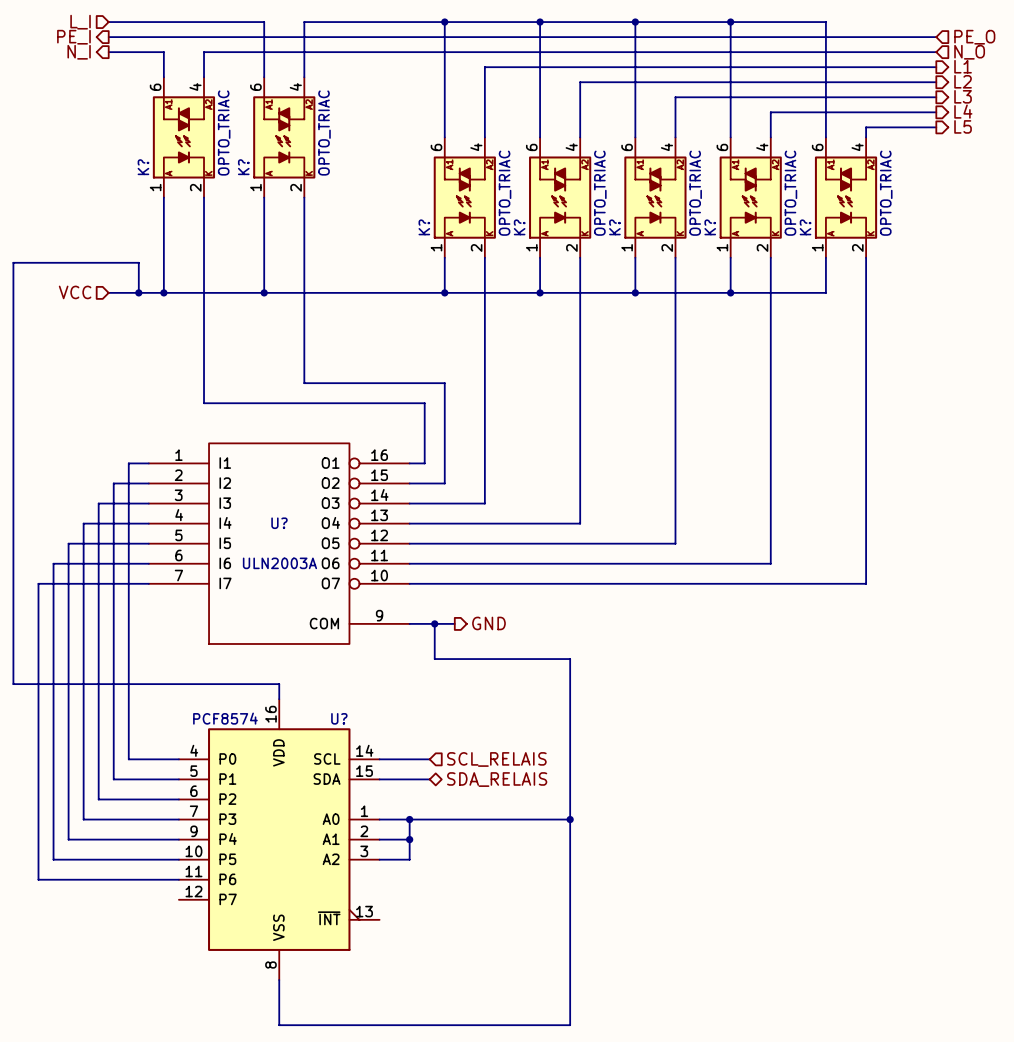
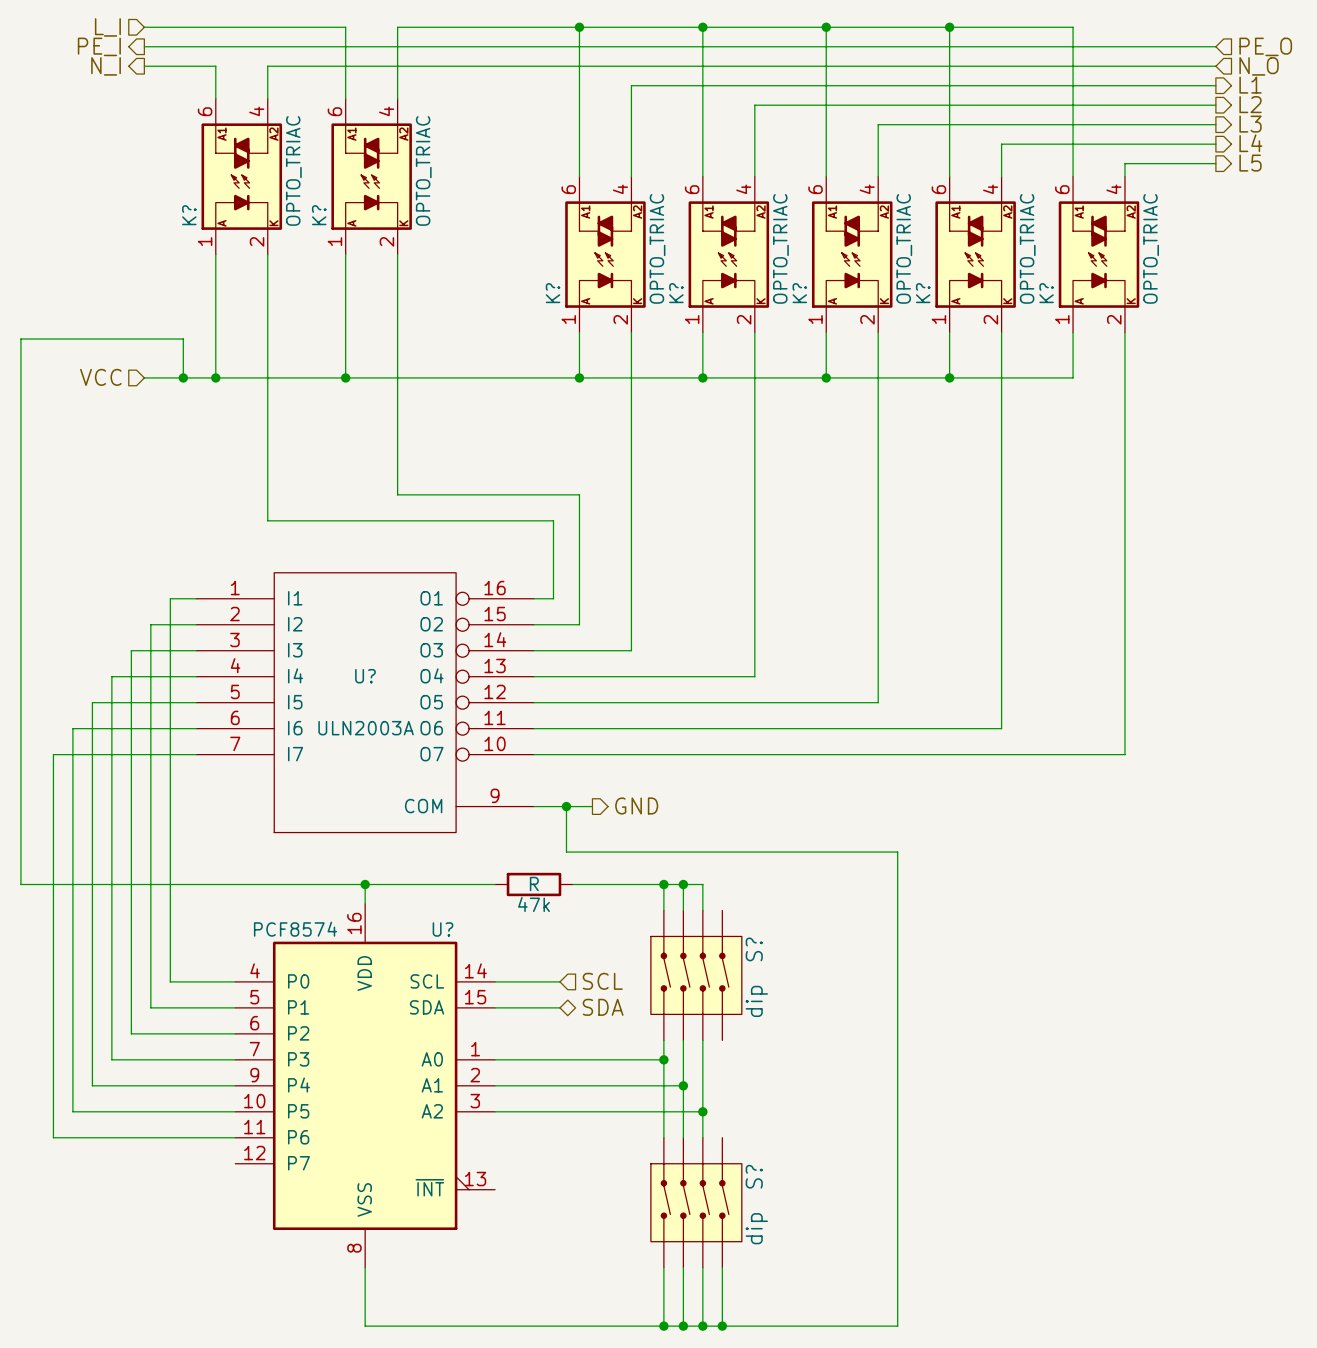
wire: (570, 659) (570, 1025) -> (741, 852) (897, 852) (897, 1326) (741, 1326)
wire: none -> (365, 884) (495, 884)
junction: none -> (365, 884)
47k: none -> R (534, 884)
wire: none -> (572, 884) (702, 884) (702, 910)
wire: none -> (663, 884) (663, 910)
junction: none -> (663, 884)
wire: none -> (683, 884) (683, 910)
junction: none -> (683, 884)
S?: none -> dip (696, 975)
hierarchical label: SCL_RELAIS (496, 759) -> SCL (602, 981)
hierarchical label: SDA_RELAIS (497, 779) -> SDA (603, 1007)
wire: none -> (663, 1040) (663, 1137)
wire: none -> (683, 1040) (683, 1137)
wire: none -> (702, 1040) (702, 1137)
wire: (409, 819) (409, 859) -> (702, 1111) (534, 1111)
junction: (409, 819) -> none
wire: (509, 819) (570, 819) -> none
junction: none -> (663, 1059)
junction: (570, 819) -> none
wire: none -> (534, 1085) (683, 1085)
junction: (409, 839) -> none
junction: none -> (683, 1085)
junction: none -> (702, 1111)
S?: none -> dip (696, 1202)
wire: none -> (663, 1267) (663, 1326)
wire: none -> (683, 1267) (683, 1326)
wire: none -> (702, 1267) (702, 1326)
wire: none -> (722, 1267) (722, 1326)
junction: none -> (663, 1326)
junction: none -> (683, 1326)
junction: none -> (702, 1326)
junction: none -> (722, 1326)

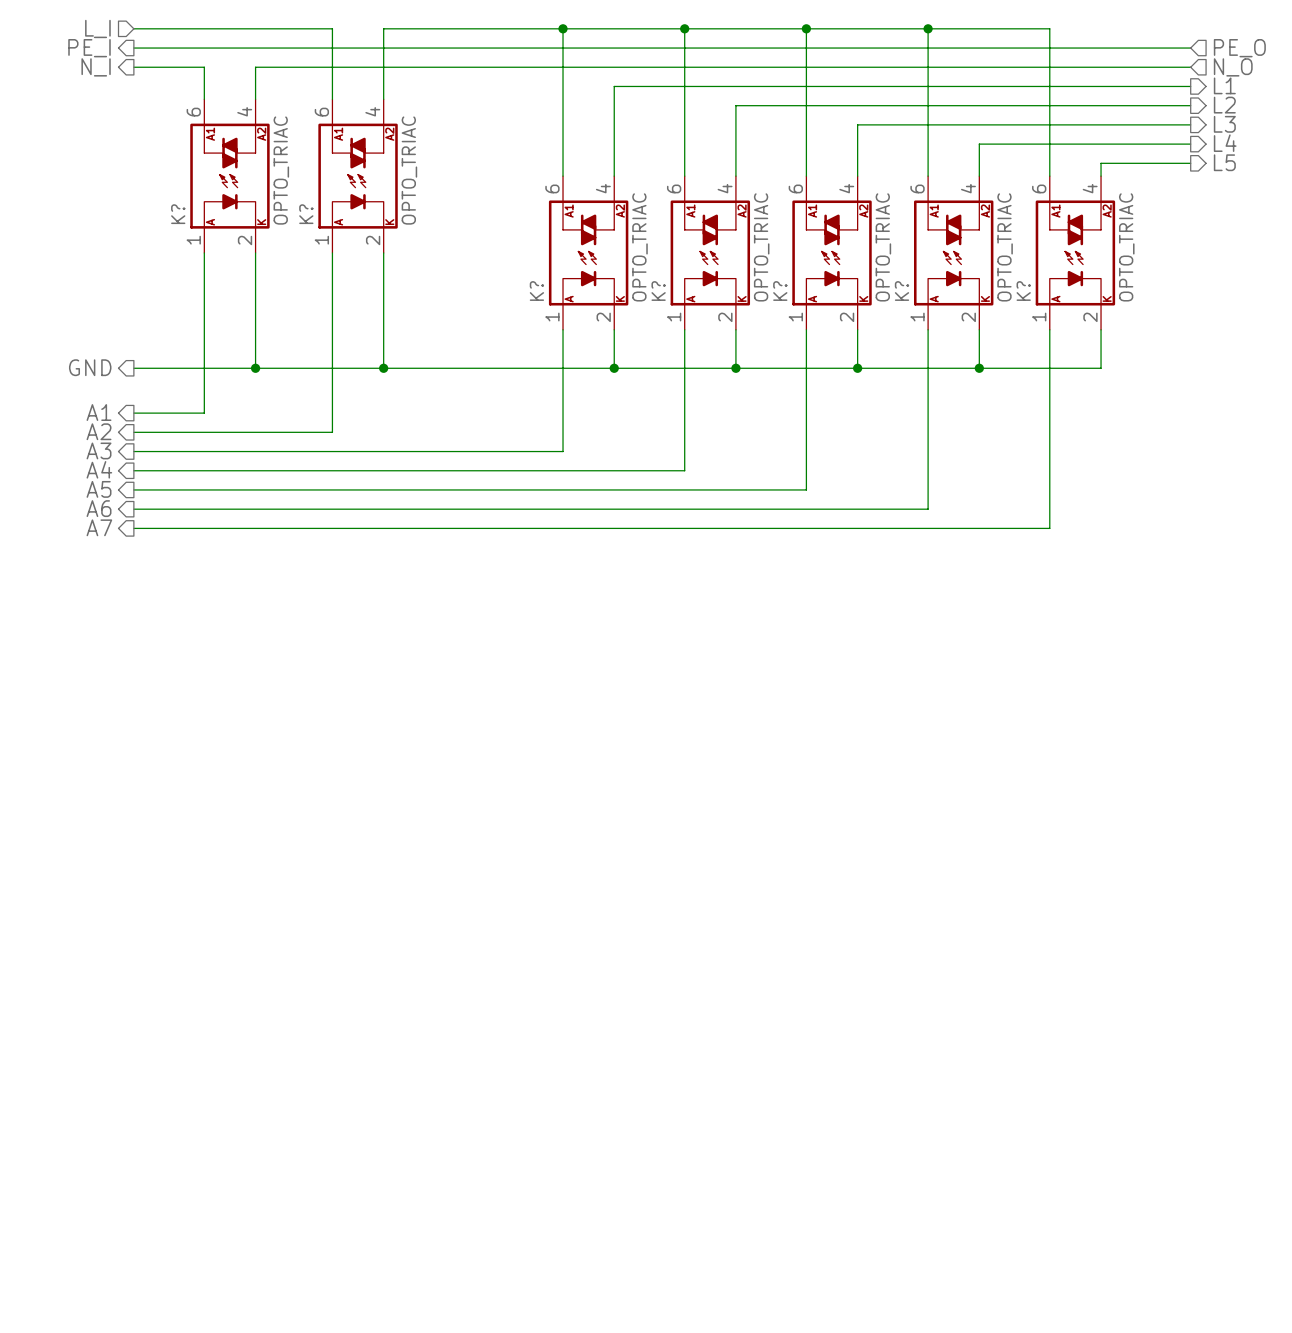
wire: (267, 371) (267, 520) (553, 520) (553, 598) (534, 598) -> none
junction: none -> (255, 368)
wire: (397, 371) (397, 494) -> (133, 489) (383, 489)
junction: none -> (383, 368)
wire: (631, 371) (631, 650) (534, 650) -> none
junction: none -> (614, 368)
wire: (754, 371) (754, 676) (534, 676) -> none
junction: none -> (735, 368)
wire: (878, 371) (878, 702) (534, 702) -> none
junction: none -> (857, 368)
wire: (1001, 371) (1001, 728) (534, 728) -> none
junction: none -> (979, 368)
wire: (1124, 371) (1124, 754) (534, 754) -> (1101, 368) (133, 368)
hierarchical label shape: input (100, 377) -> output (90, 367)
hierarchical label: VCC (100, 377) -> GND (90, 367)
wire: (144, 377) (1073, 377) -> (133, 528) (1049, 528) (1049, 374)
wire: (183, 377) (183, 338) (20, 338) (20, 884) (495, 884) -> none
junction: (183, 377) -> none
wire: none -> (204, 374) (204, 413) (133, 413)
junction: (215, 377) -> none
wire: none -> (332, 374) (332, 432) (133, 432)
junction: (345, 377) -> none
wire: none -> (563, 374) (563, 451) (133, 451)
junction: (579, 377) -> none
wire: none -> (684, 374) (684, 470) (133, 470)
junction: (702, 377) -> none
junction: (826, 377) -> none
wire: none -> (928, 374) (928, 509) (133, 509)
junction: (949, 377) -> none
hierarchical label: none -> A1 (99, 412)
hierarchical label: none -> A2 (99, 431)
hierarchical label: none -> A3 (99, 450)
hierarchical label: none -> A4 (99, 469)
hierarchical label: none -> A5 (99, 489)
wire: (579, 494) (579, 624) (534, 624) -> (563, 489) (806, 489) (806, 374)
hierarchical label: none -> A6 (99, 508)
hierarchical label: none -> A7 (99, 527)
wire: (196, 598) (170, 598) (170, 981) (235, 981) -> none
wire: (196, 624) (150, 624) (150, 1007) (235, 1007) -> none
wire: (196, 650) (131, 650) (131, 1033) (235, 1033) -> none
wire: (196, 676) (111, 676) (111, 1059) (235, 1059) -> none
wire: (196, 702) (92, 702) (92, 1085) (235, 1085) -> none
U?: ULN2003A (365, 702) -> none
wire: (196, 728) (72, 728) (72, 1111) (235, 1111) -> none
wire: (196, 754) (53, 754) (53, 1137) (235, 1137) -> none
hierarchical label: GND (636, 805) -> none
wire: (534, 806) (592, 806) -> none
wire: (566, 806) (566, 852) (897, 852) (897, 1326) (365, 1326) (365, 1267) -> none
junction: (566, 806) -> none
wire: (365, 884) (365, 903) -> none
junction: (365, 884) -> none
47k: R (534, 884) -> none
wire: (572, 884) (702, 884) (702, 910) -> none
wire: (663, 884) (663, 910) -> none
junction: (663, 884) -> none
wire: (683, 884) (683, 910) -> none
junction: (683, 884) -> none
S?: dip (696, 975) -> none
wire: (495, 981) (559, 981) -> none
hierarchical label: SCL (602, 981) -> none
wire: (495, 1007) (559, 1007) -> none
hierarchical label: SDA (603, 1007) -> none
wire: (663, 1040) (663, 1137) -> none
wire: (683, 1040) (683, 1137) -> none
wire: (702, 1040) (702, 1137) -> none
wire: (495, 1059) (663, 1059) -> none
junction: (663, 1059) -> none
U?: PCF8574 (365, 1085) -> none
wire: (495, 1085) (683, 1085) -> none
junction: (683, 1085) -> none
wire: (495, 1111) (702, 1111) -> none
junction: (702, 1111) -> none
S?: dip (696, 1202) -> none
wire: (663, 1267) (663, 1326) -> none
wire: (683, 1267) (683, 1326) -> none
wire: (702, 1267) (702, 1326) -> none
wire: (722, 1267) (722, 1326) -> none
junction: (663, 1326) -> none
junction: (683, 1326) -> none
junction: (702, 1326) -> none
junction: (722, 1326) -> none

